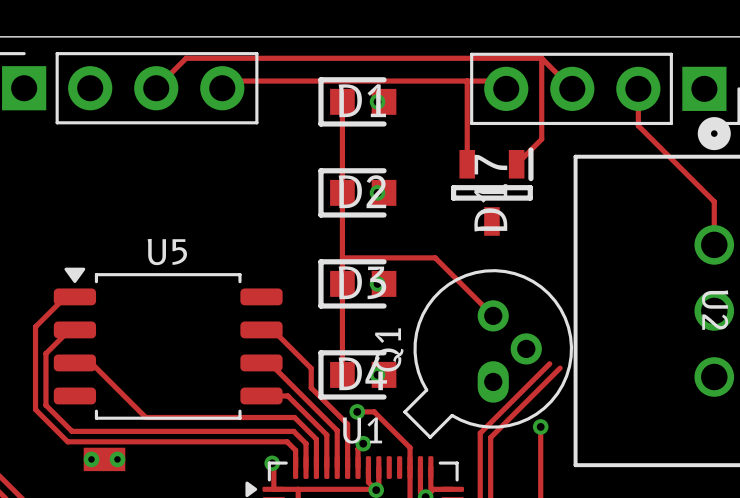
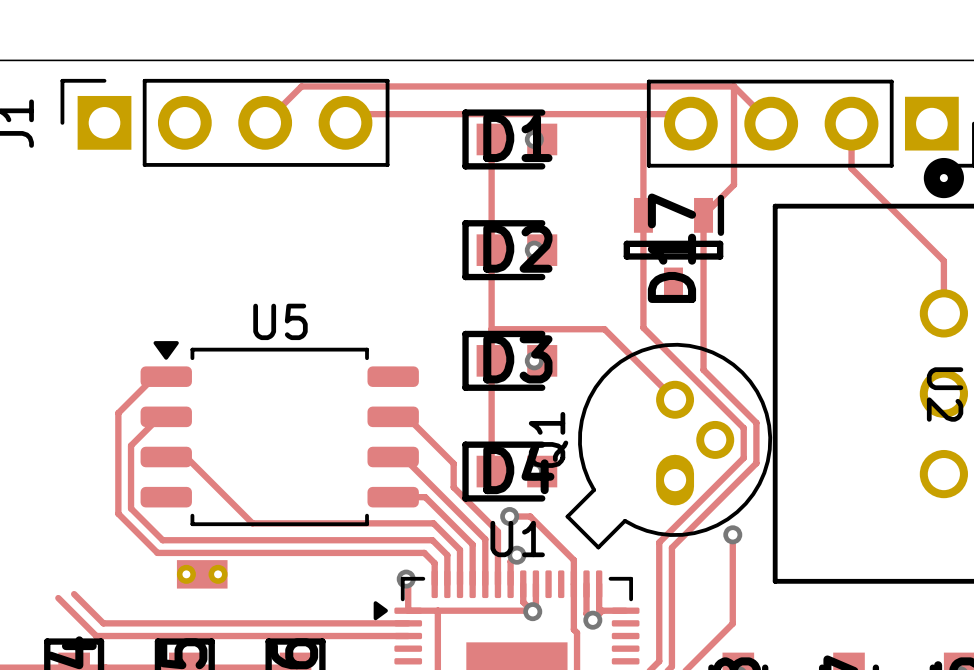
track: none -> (643, 215) (643, 327) (743, 428) (743, 458)
track: none -> (703, 215) (703, 369) (756, 422) (756, 463)

